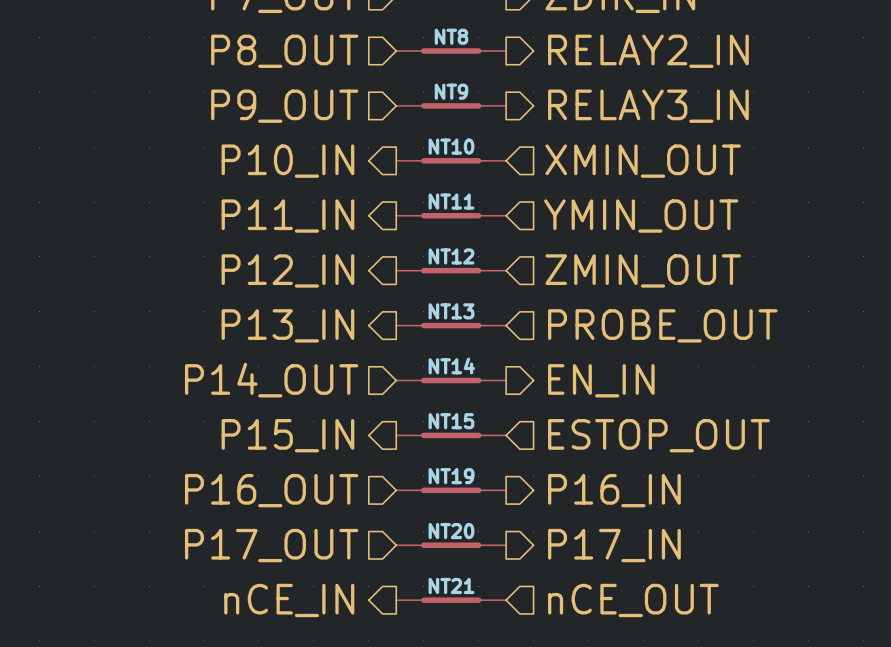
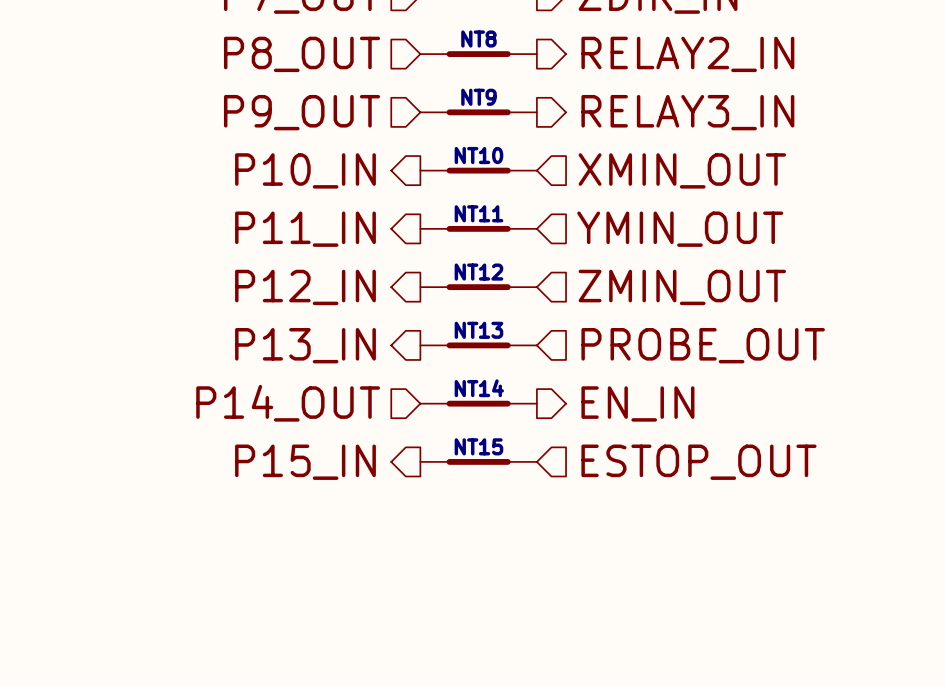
hierarchical label: P16_OUT (271, 490) -> none
NT19: (451, 490) -> none
hierarchical label: P16_IN (614, 490) -> none
hierarchical label: P17_OUT (271, 545) -> none
NT20: (451, 545) -> none
hierarchical label: P17_IN (614, 545) -> none
hierarchical label: nCE_IN (289, 600) -> none
NT21: (451, 600) -> none
hierarchical label: nCE_OUT (633, 600) -> none

